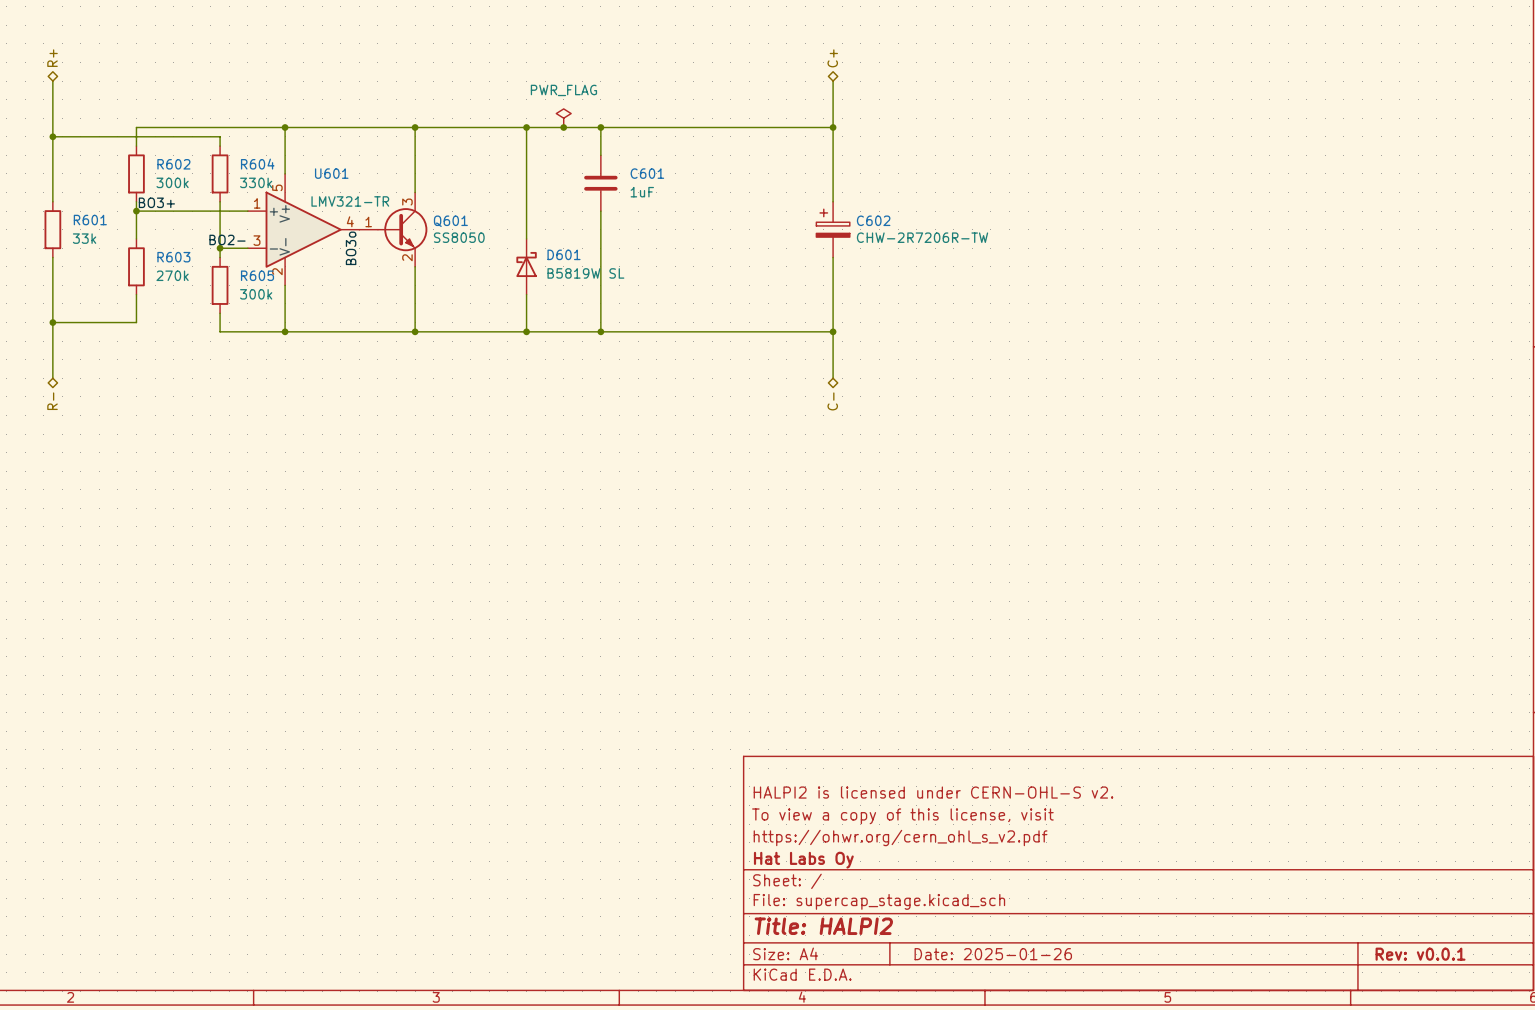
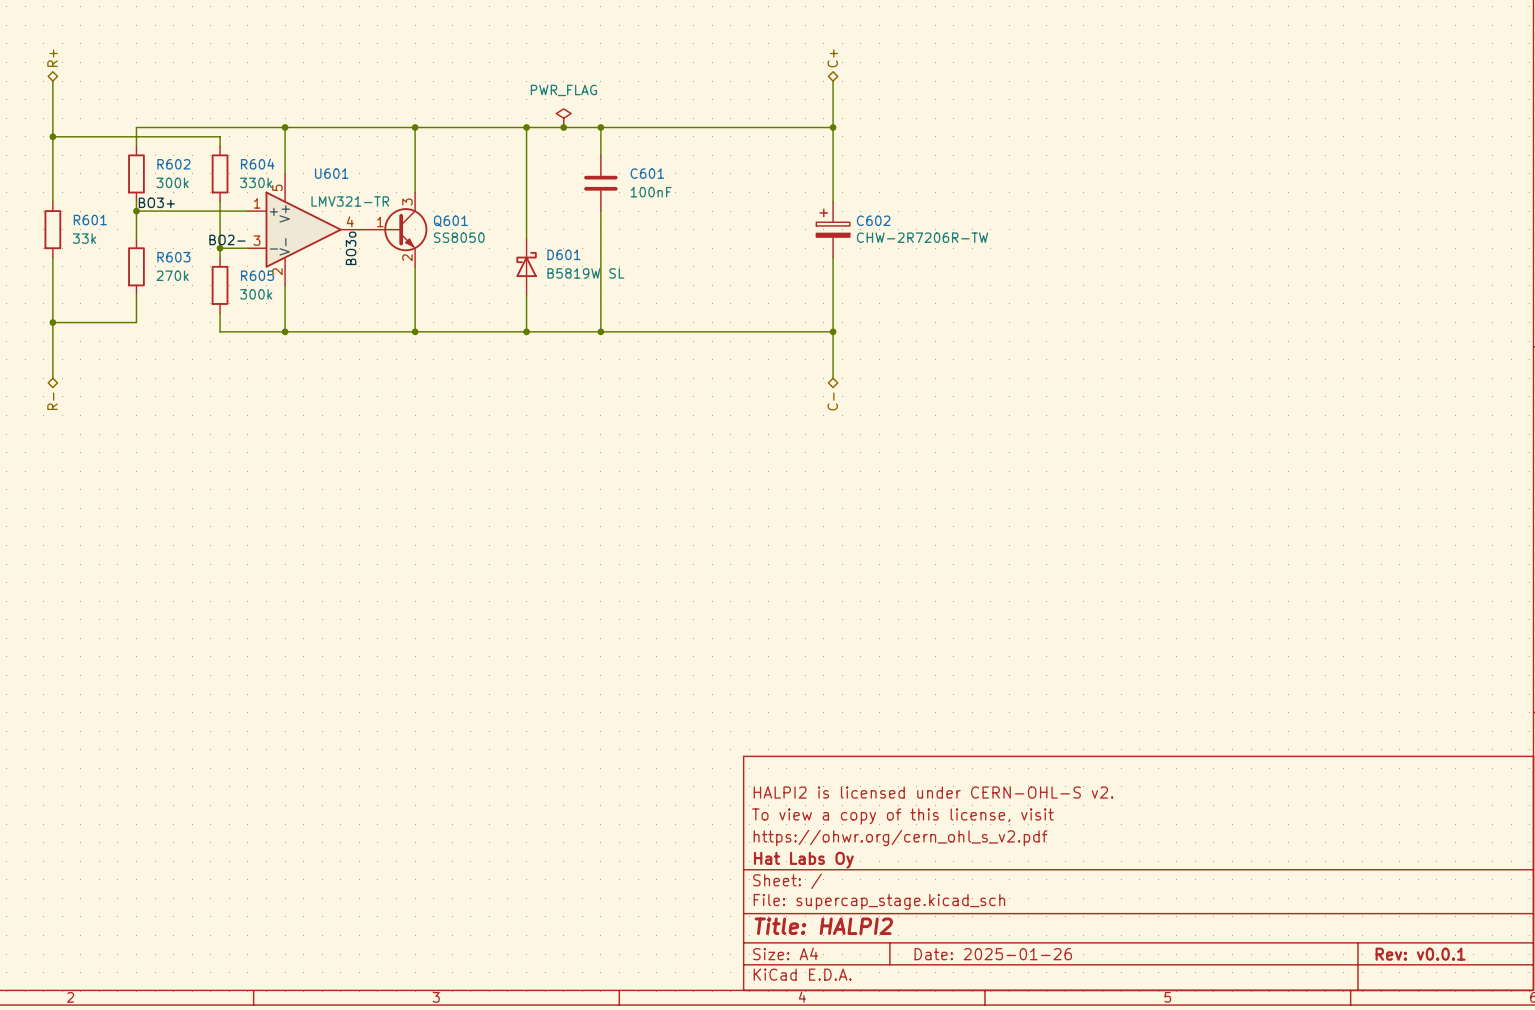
Q601 symbol: [359, 192, 428, 267] -> [359, 192, 428, 267]
C601 value: 1uF (642, 192) -> 100nF (651, 192)

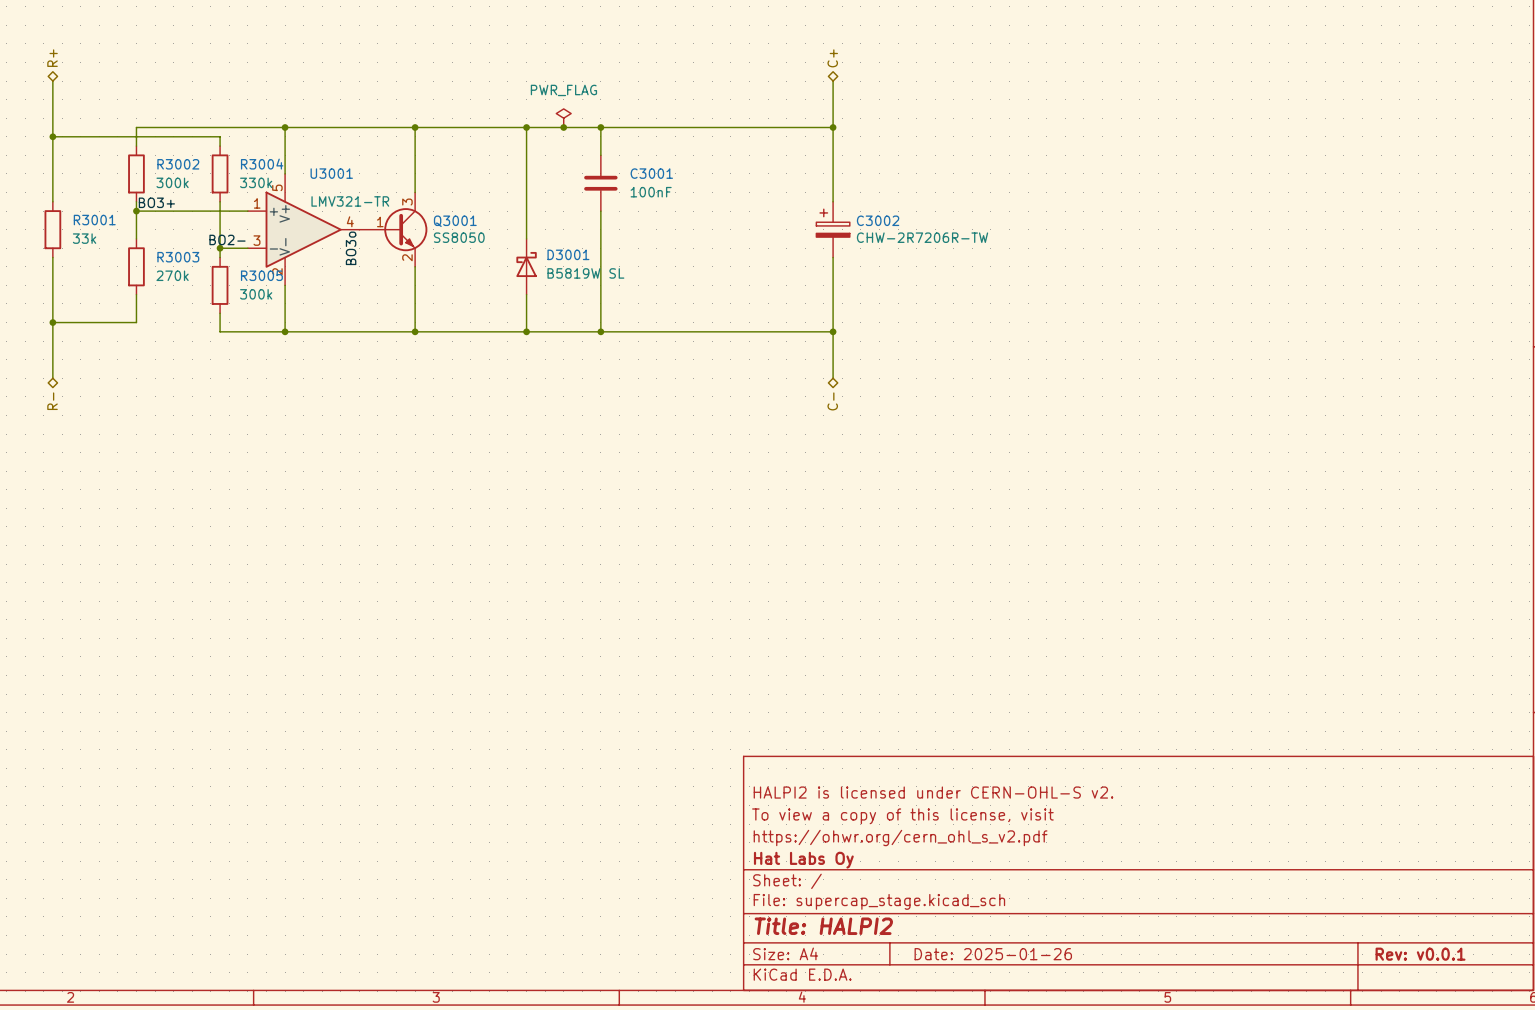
R602 name: R602 (173, 164) -> R3002 (178, 164)
R604 name: R604 (257, 164) -> R3004 (262, 164)
U601 name: U601 (331, 173) -> U3001 (331, 173)
C601 name: C601 (647, 173) -> C3001 (651, 173)
R601 name: R601 (90, 220) -> R3001 (94, 220)
C602 name: C602 (873, 220) -> C3002 (878, 220)
Q601 name: Q601 (450, 221) -> Q3001 (455, 221)
D601 name: D601 (564, 254) -> D3001 (568, 254)
R603 name: R603 (173, 257) -> R3003 (178, 257)
R605 name: R605 (257, 275) -> R3005 (261, 275)

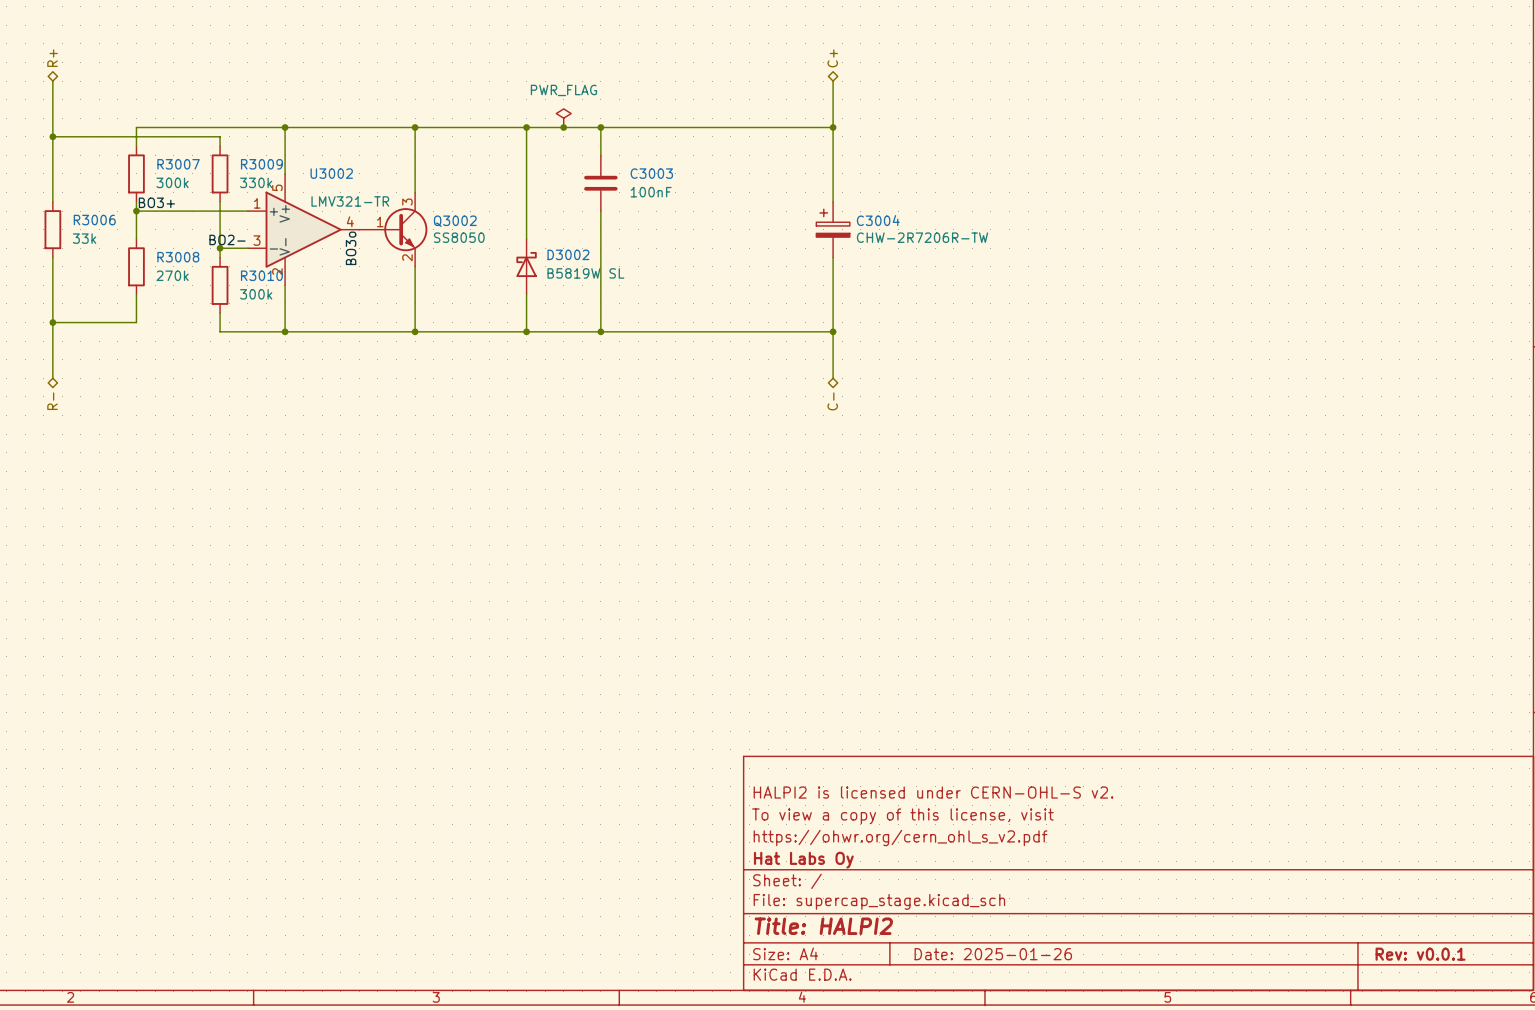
R3002 name: R3002 (178, 164) -> R3007 (178, 164)
R3004 name: R3004 (262, 164) -> R3009 (261, 164)
U3001 name: U3001 (331, 173) -> U3002 (331, 173)
C3001 name: C3001 (651, 173) -> C3003 (651, 173)
R3001 name: R3001 (94, 220) -> R3006 (94, 220)
C3002 name: C3002 (878, 220) -> C3004 (878, 220)
Q3001 name: Q3001 (455, 221) -> Q3002 (455, 221)
D3001 name: D3001 (568, 254) -> D3002 (568, 254)
R3003 name: R3003 (178, 257) -> R3008 (178, 257)
R3005 name: R3005 (261, 275) -> R3010 (261, 275)

